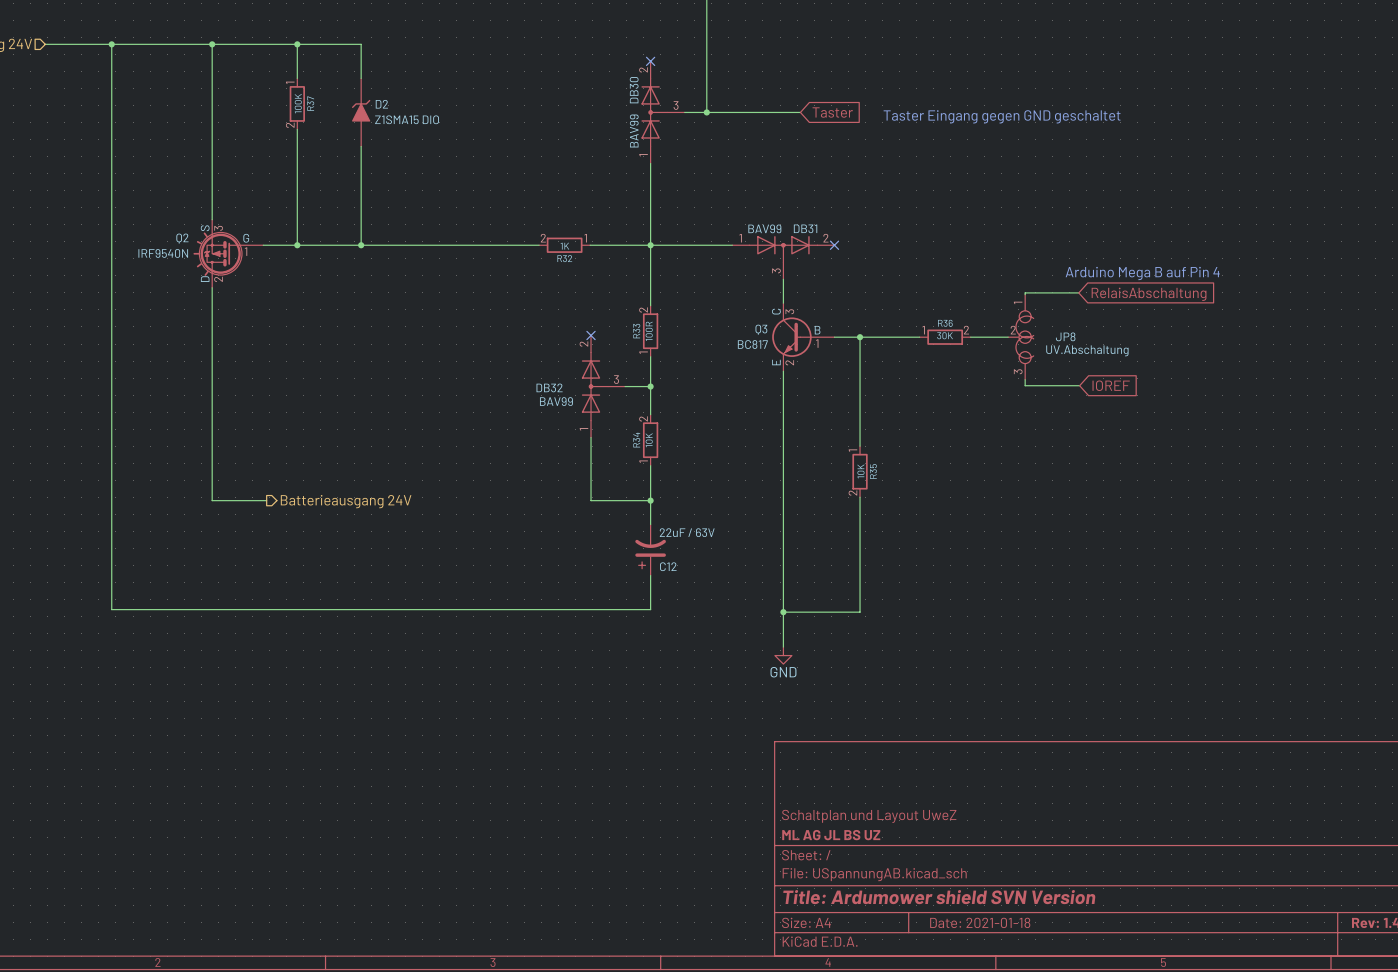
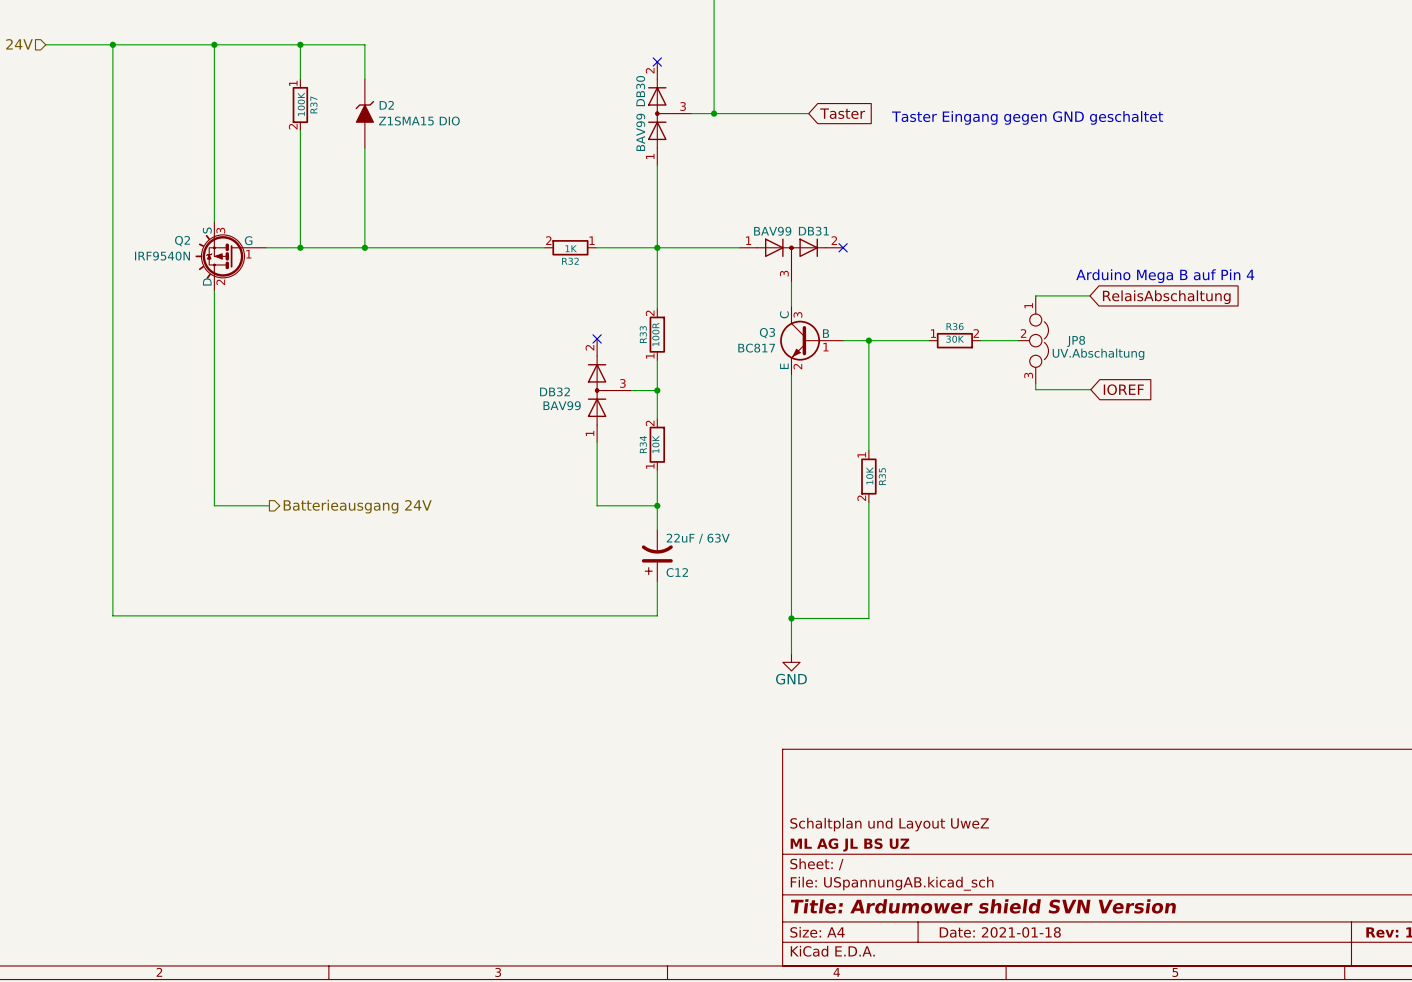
JP8 symbol: [1008, 294, 1034, 380] -> [1018, 297, 1049, 384]

